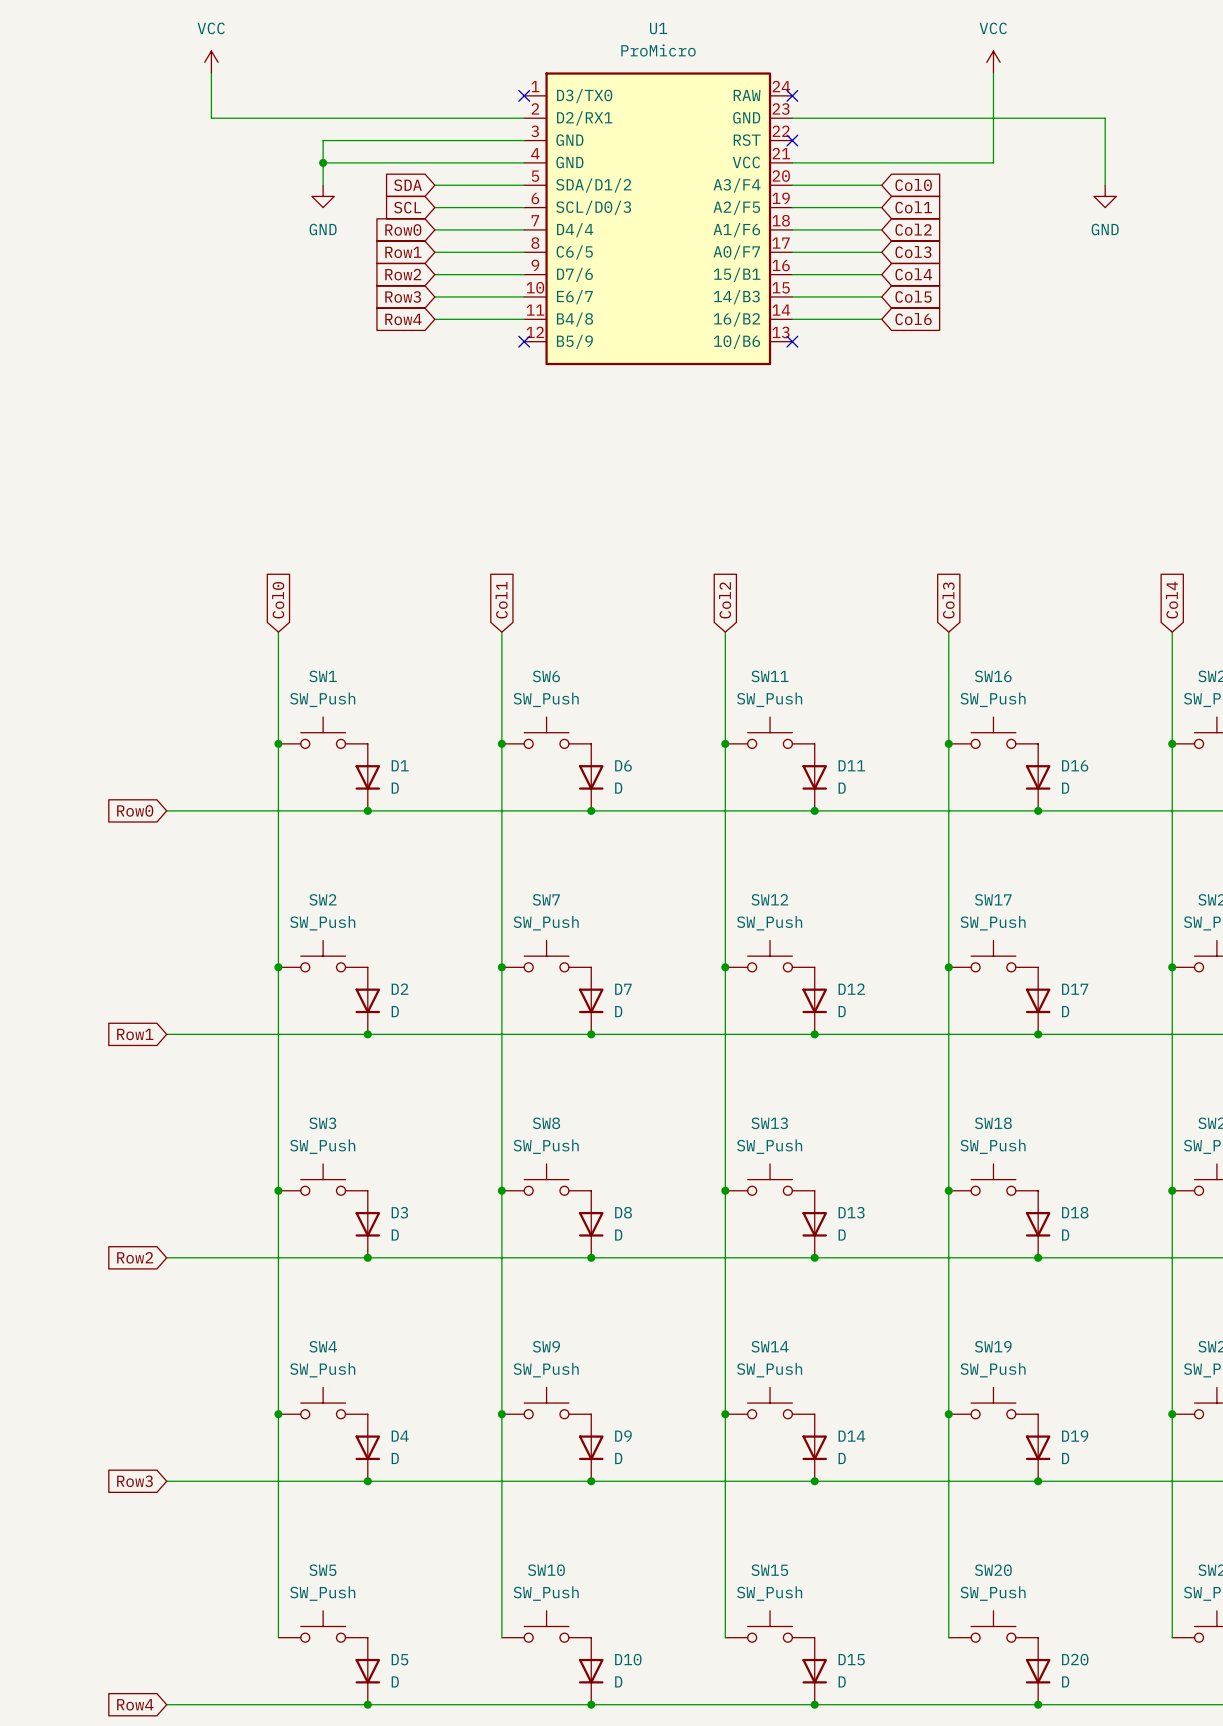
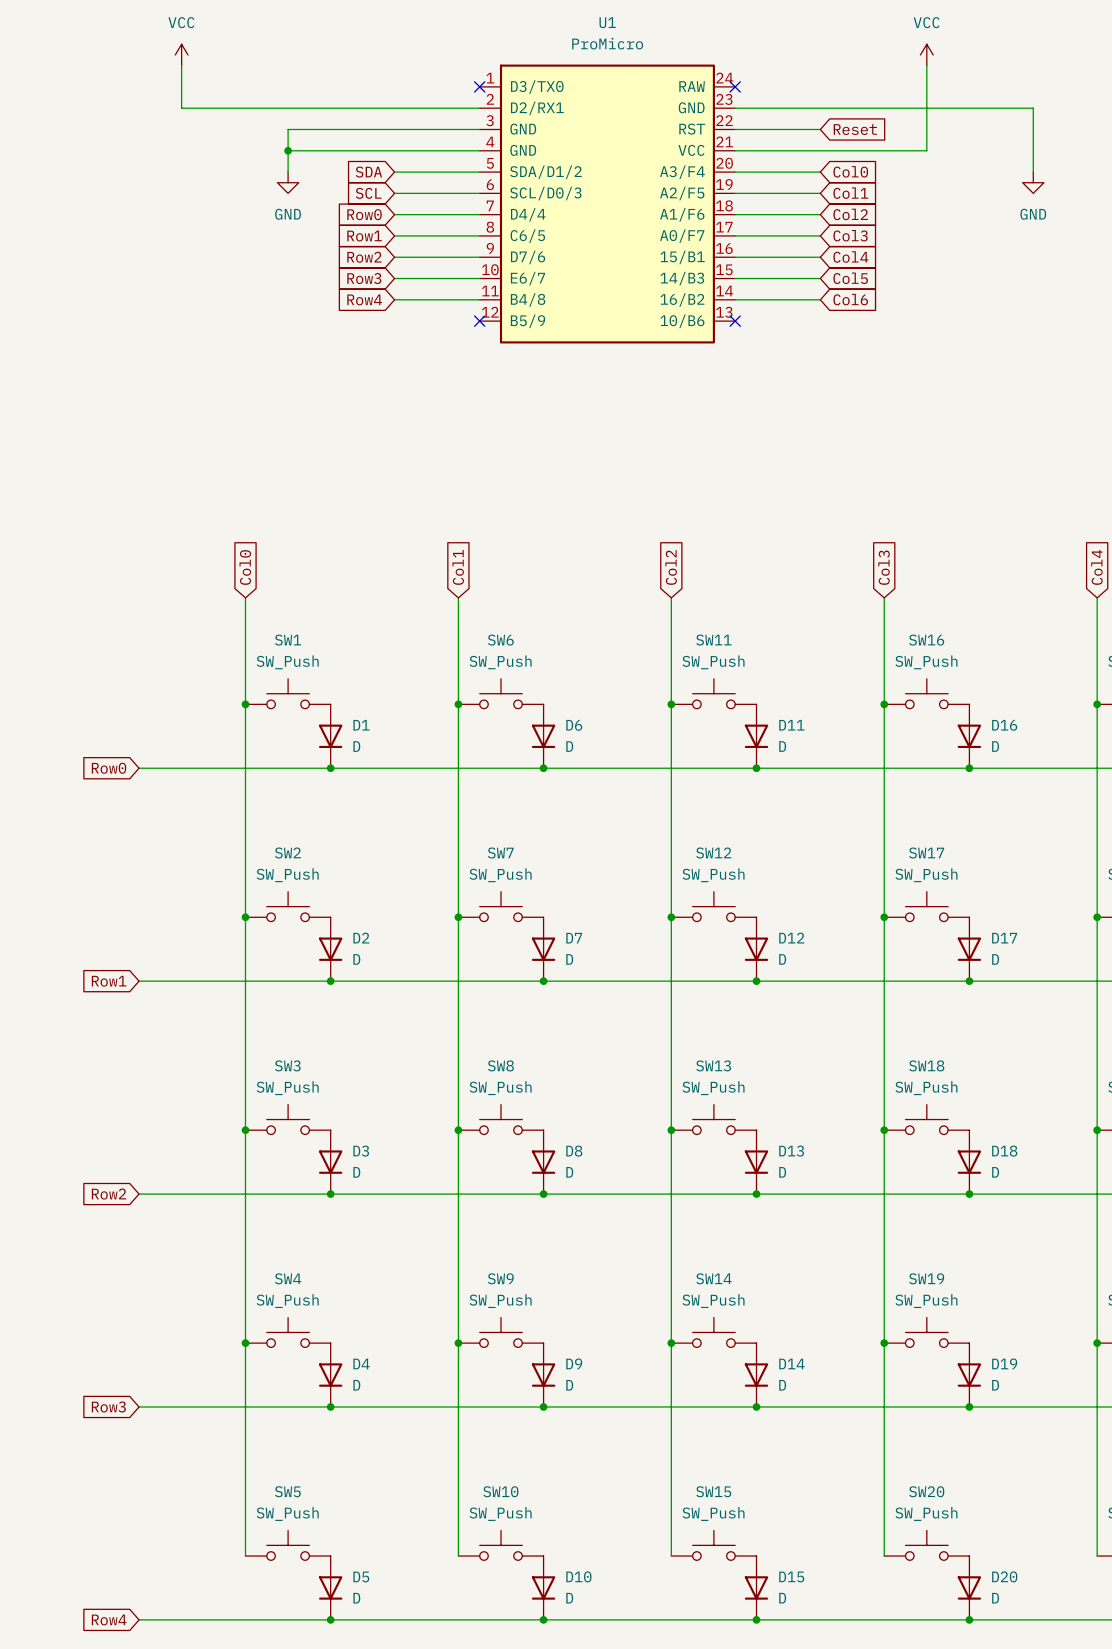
wire: none -> (735, 129) (820, 129)
no-connect mark: (792, 140) -> none
global label: none -> Reset (855, 129)

